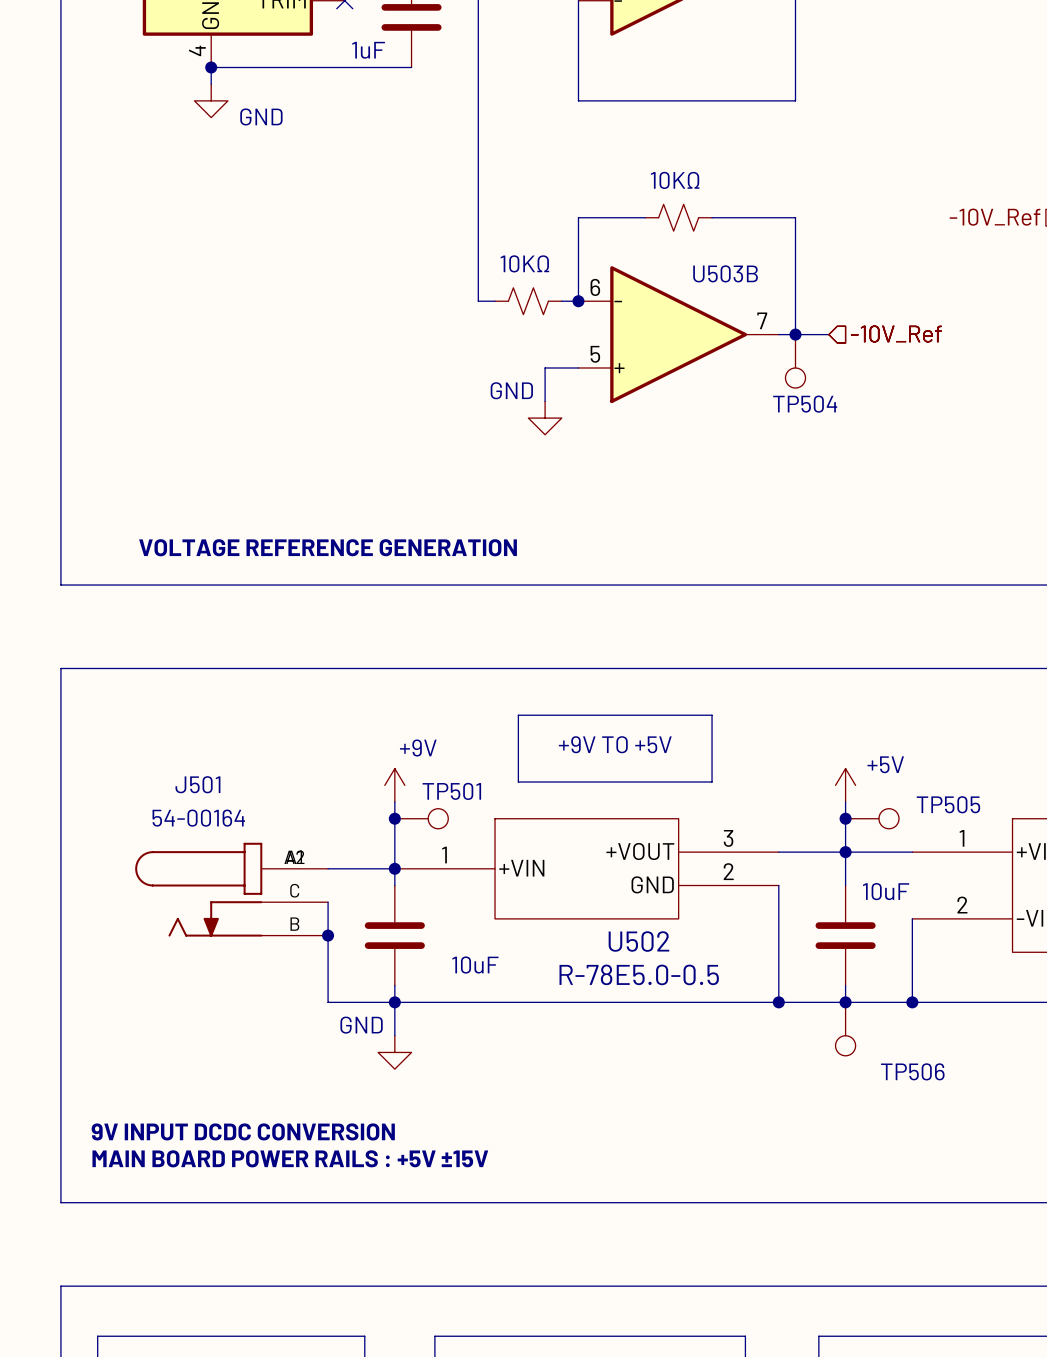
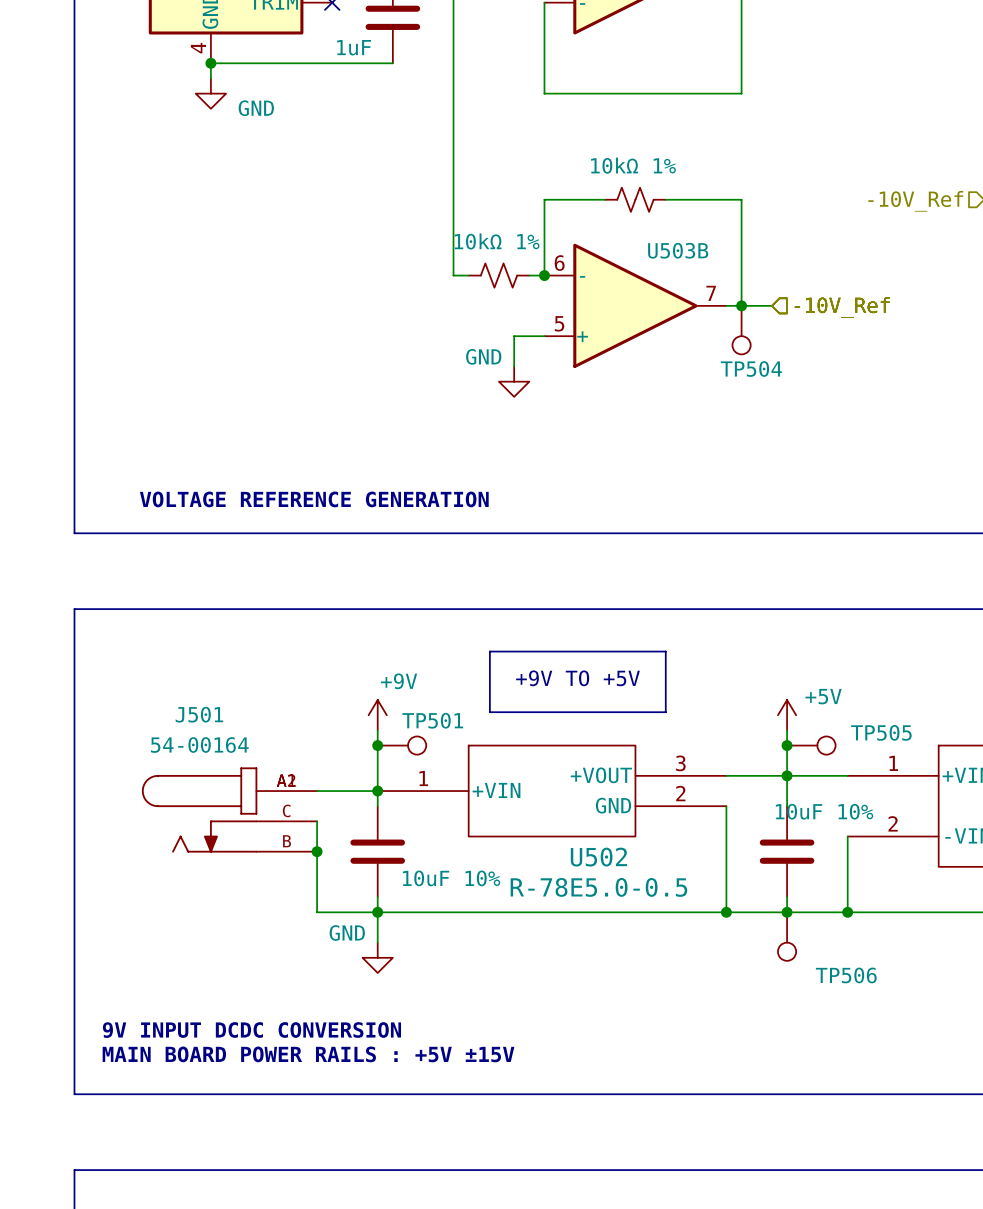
part value: 10KΩ (675, 180) -> 10kΩ 1% (633, 165)
part value: 10KΩ (524, 263) -> 10kΩ 1% (497, 241)
part value: 10uF (886, 891) -> 10uF 10% (824, 811)
part value: 10uF (475, 965) -> 10uF 10% (451, 878)

